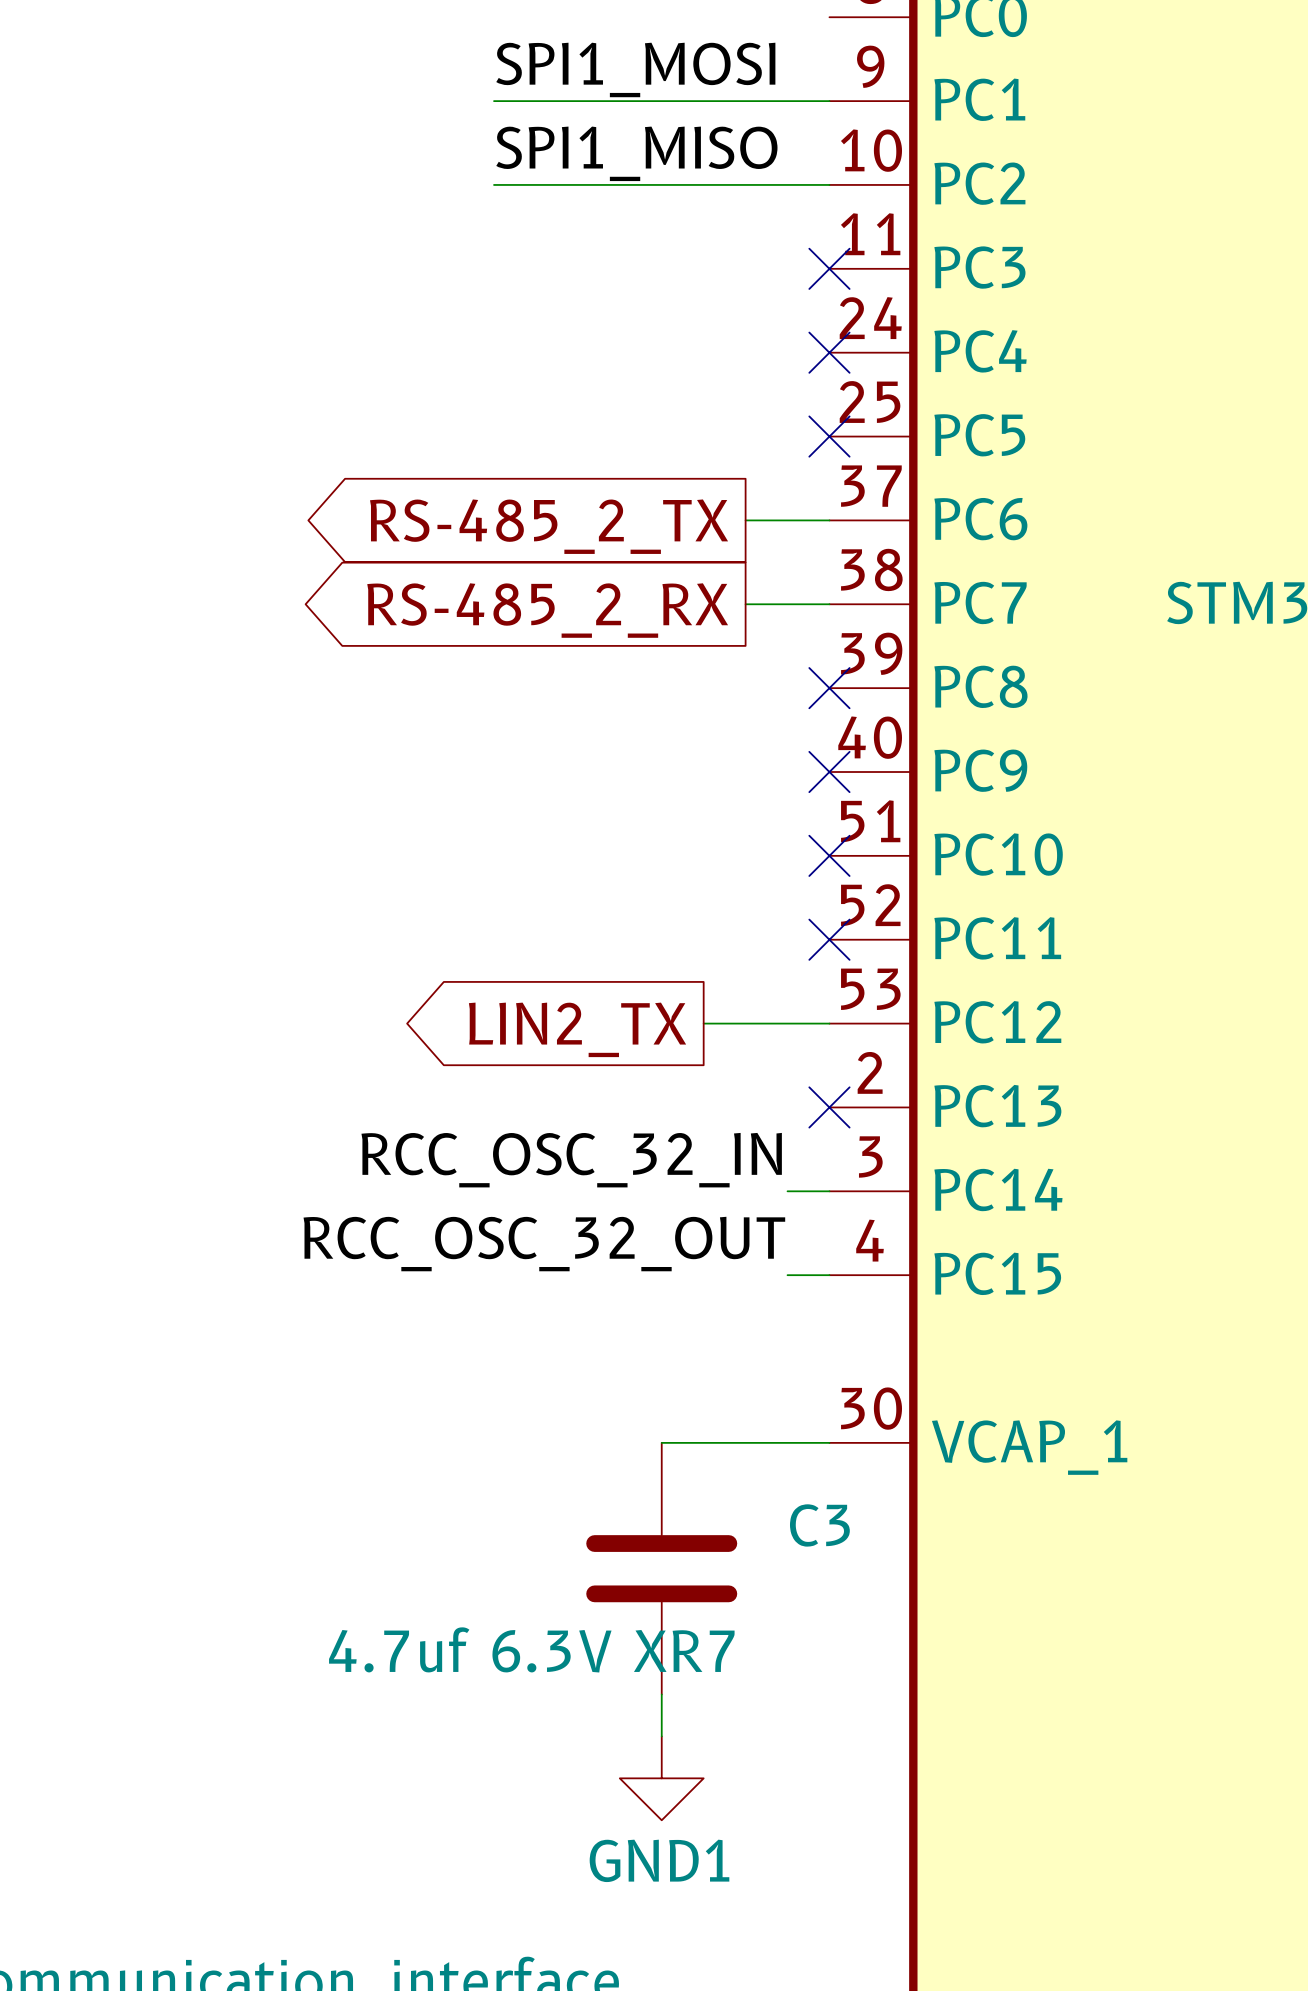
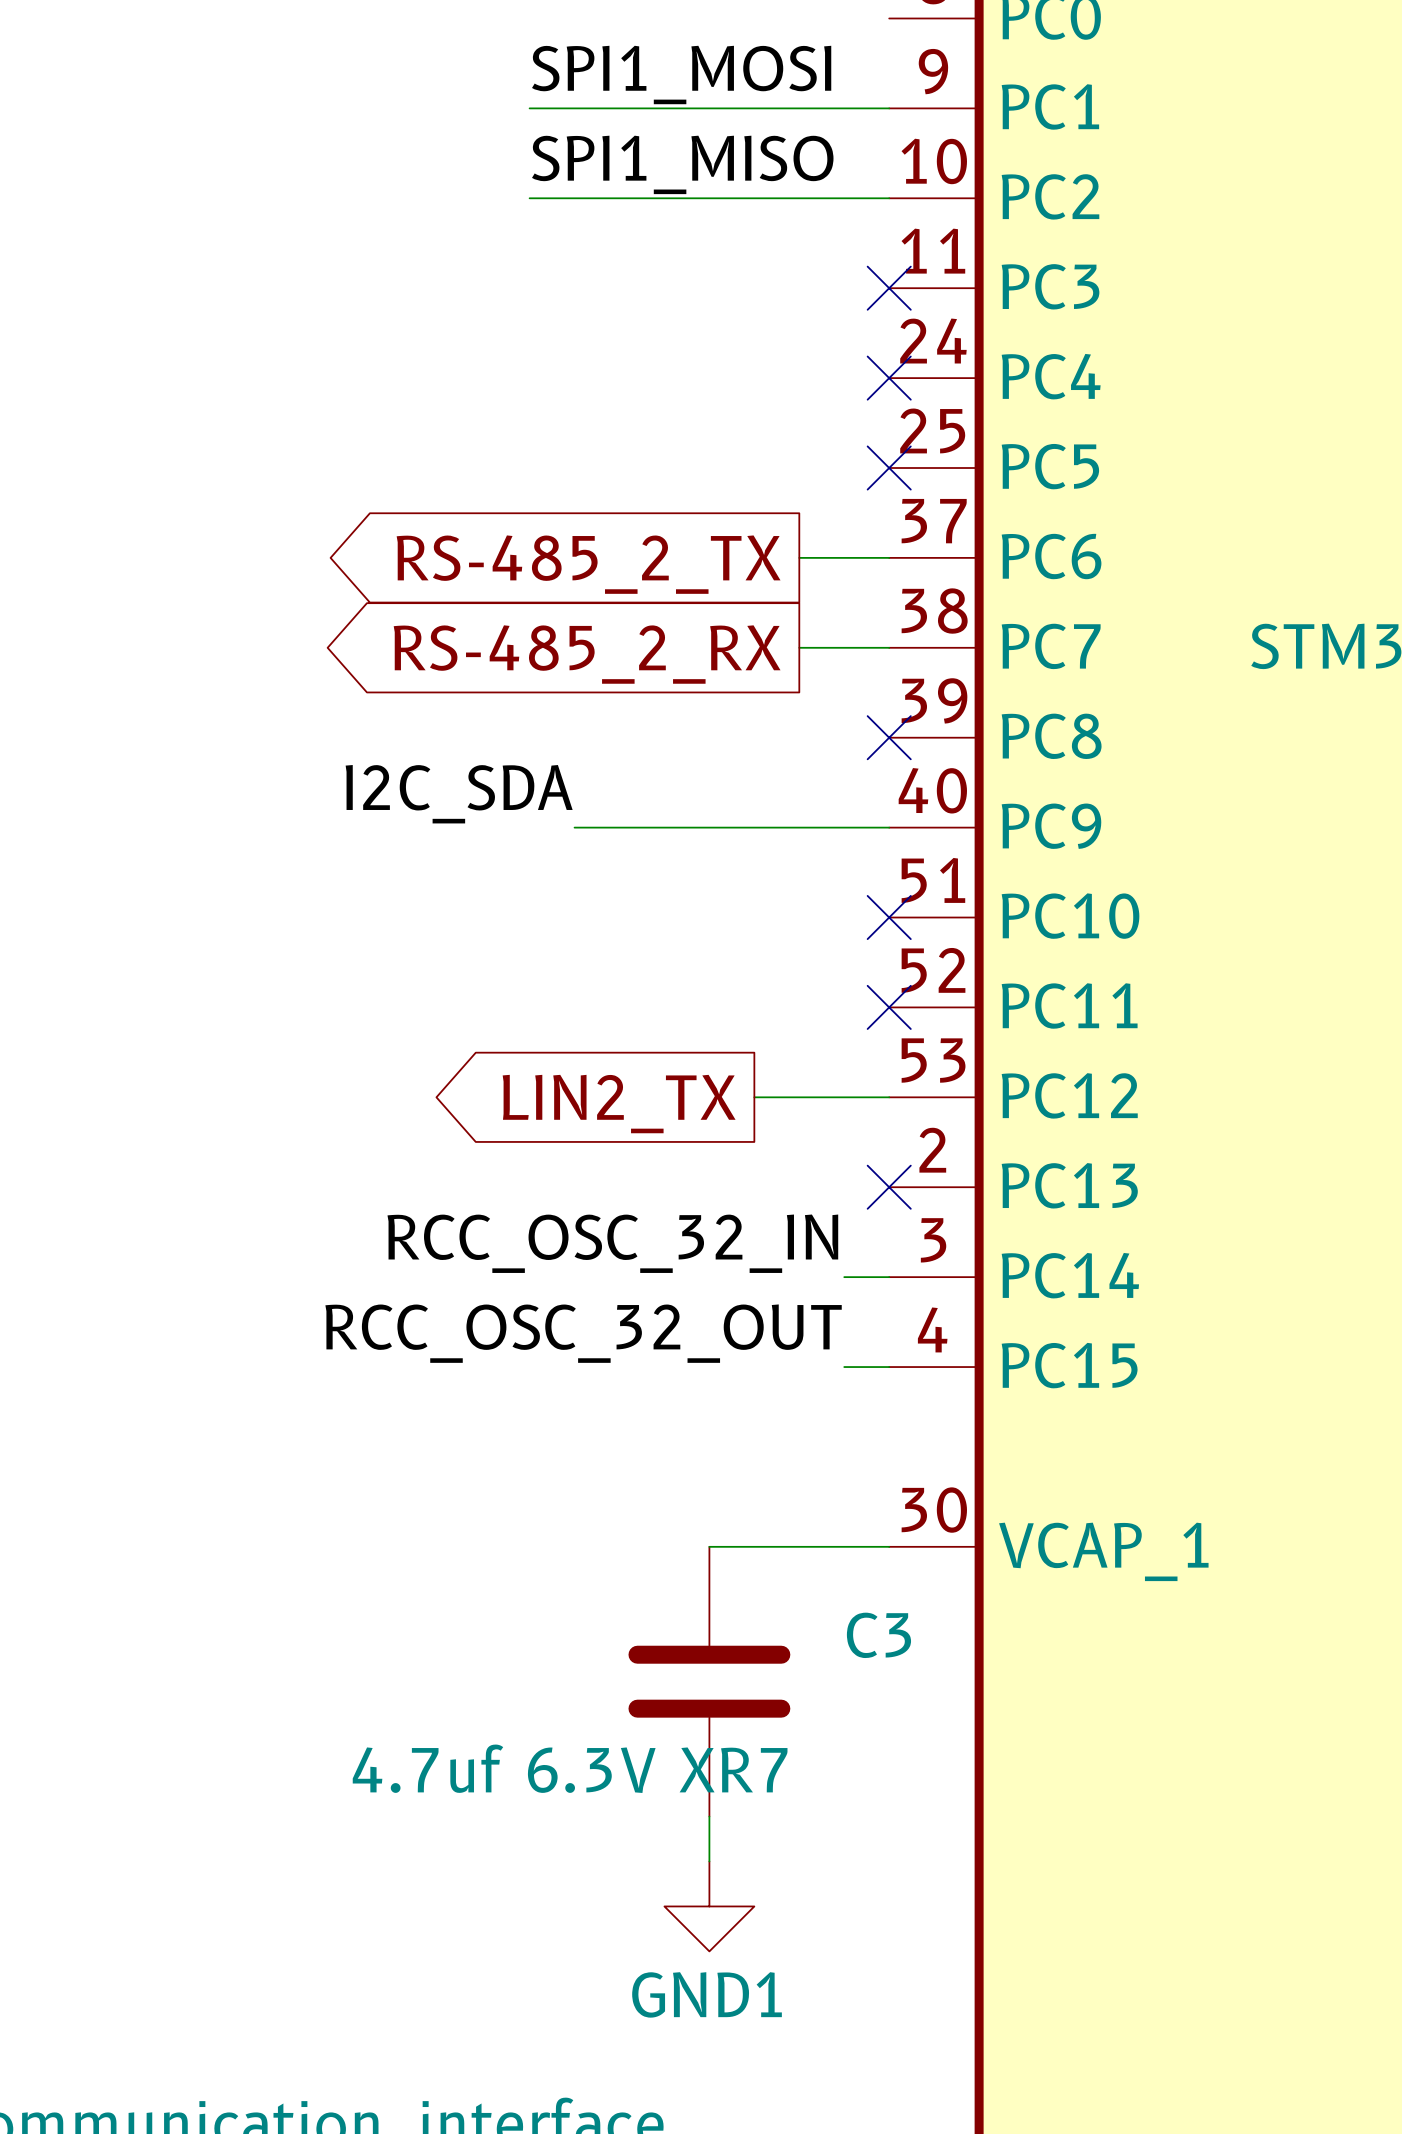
label: none -> I2C_SDA (459, 794)
wire: none -> (574, 827) (889, 827)
no-connect mark: (829, 772) -> none

